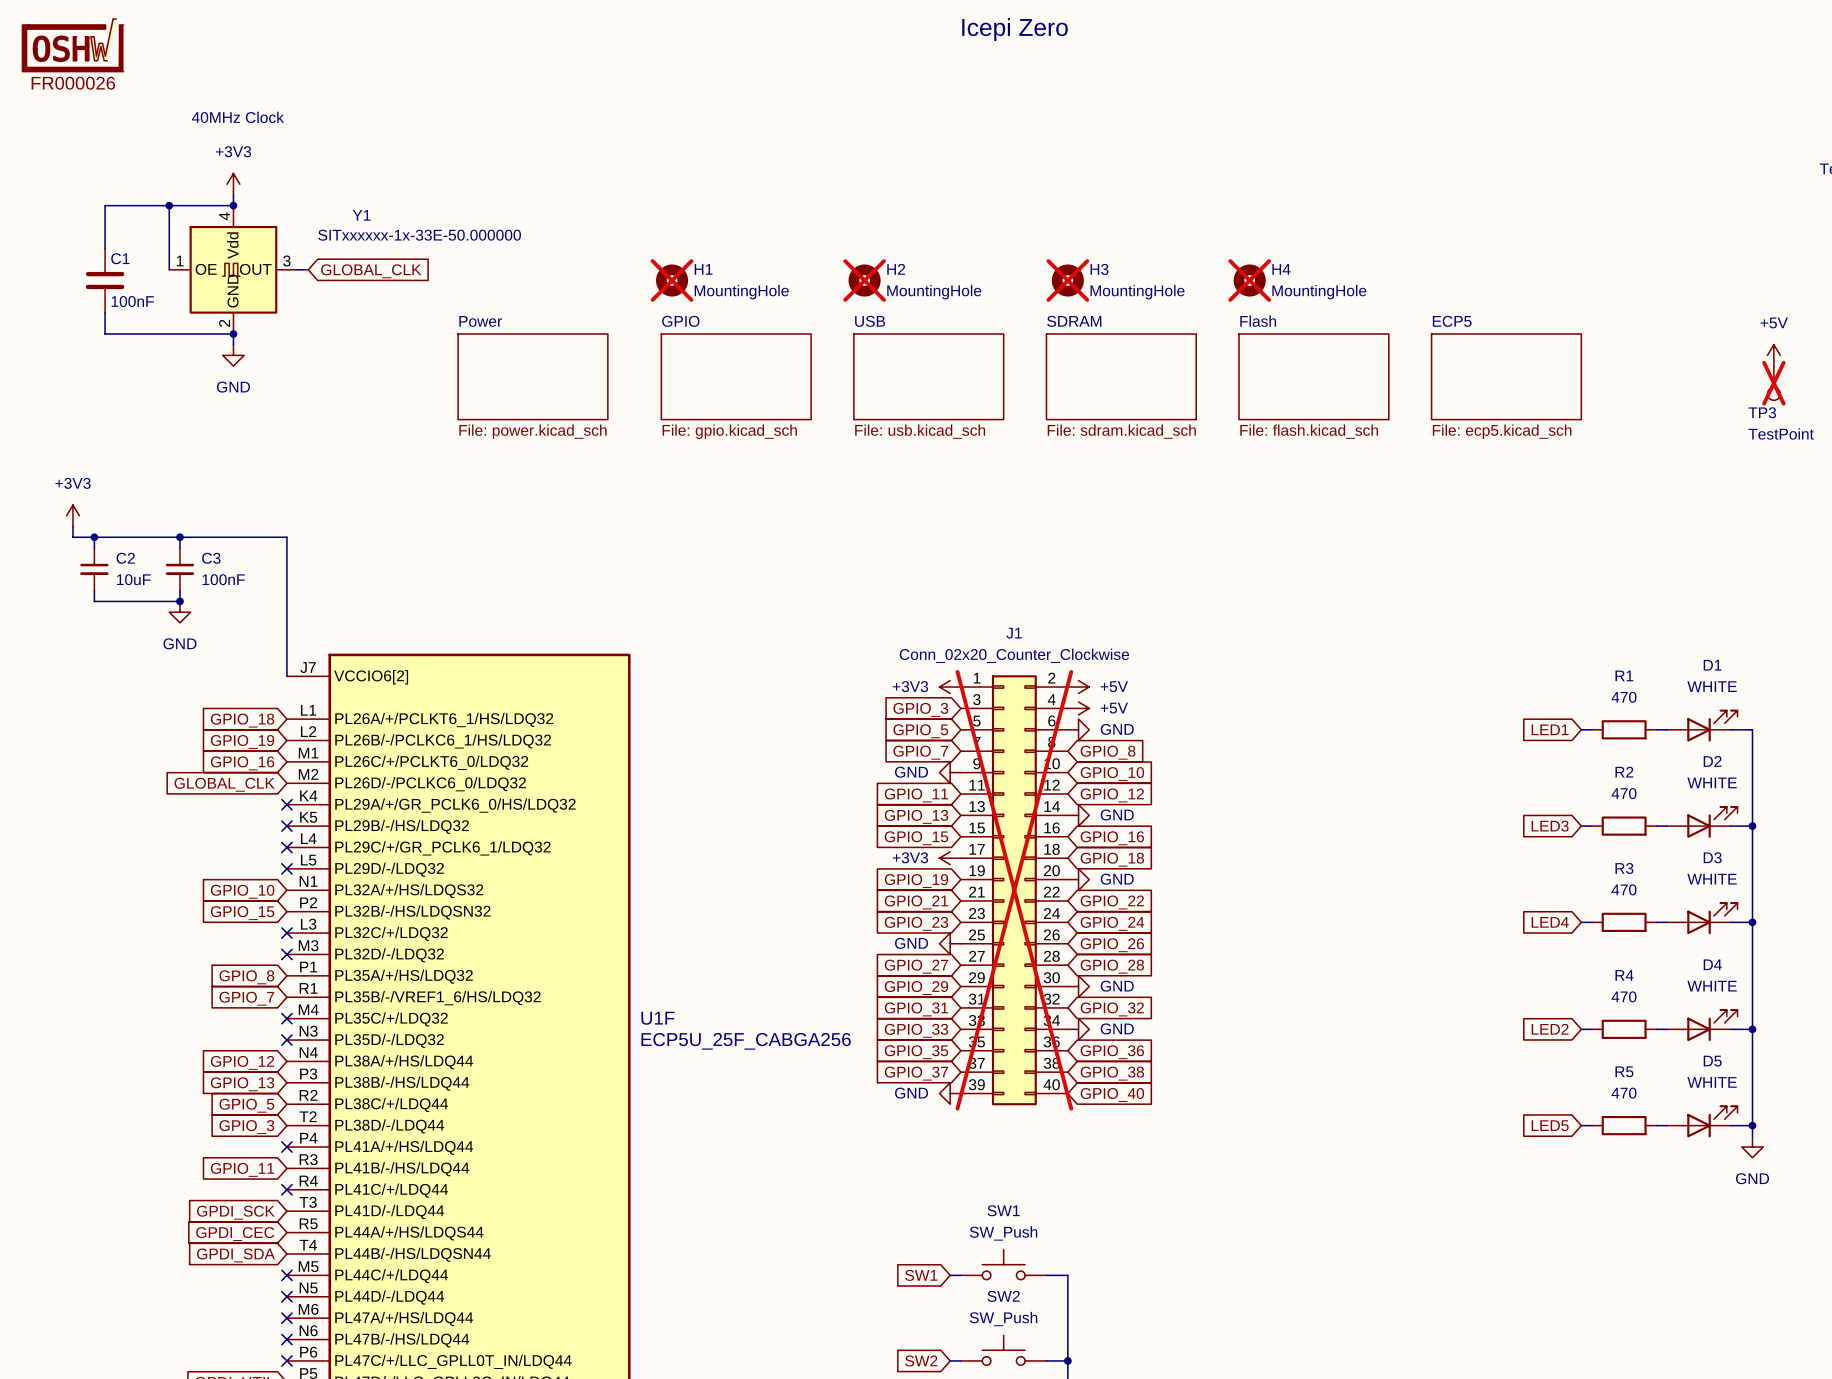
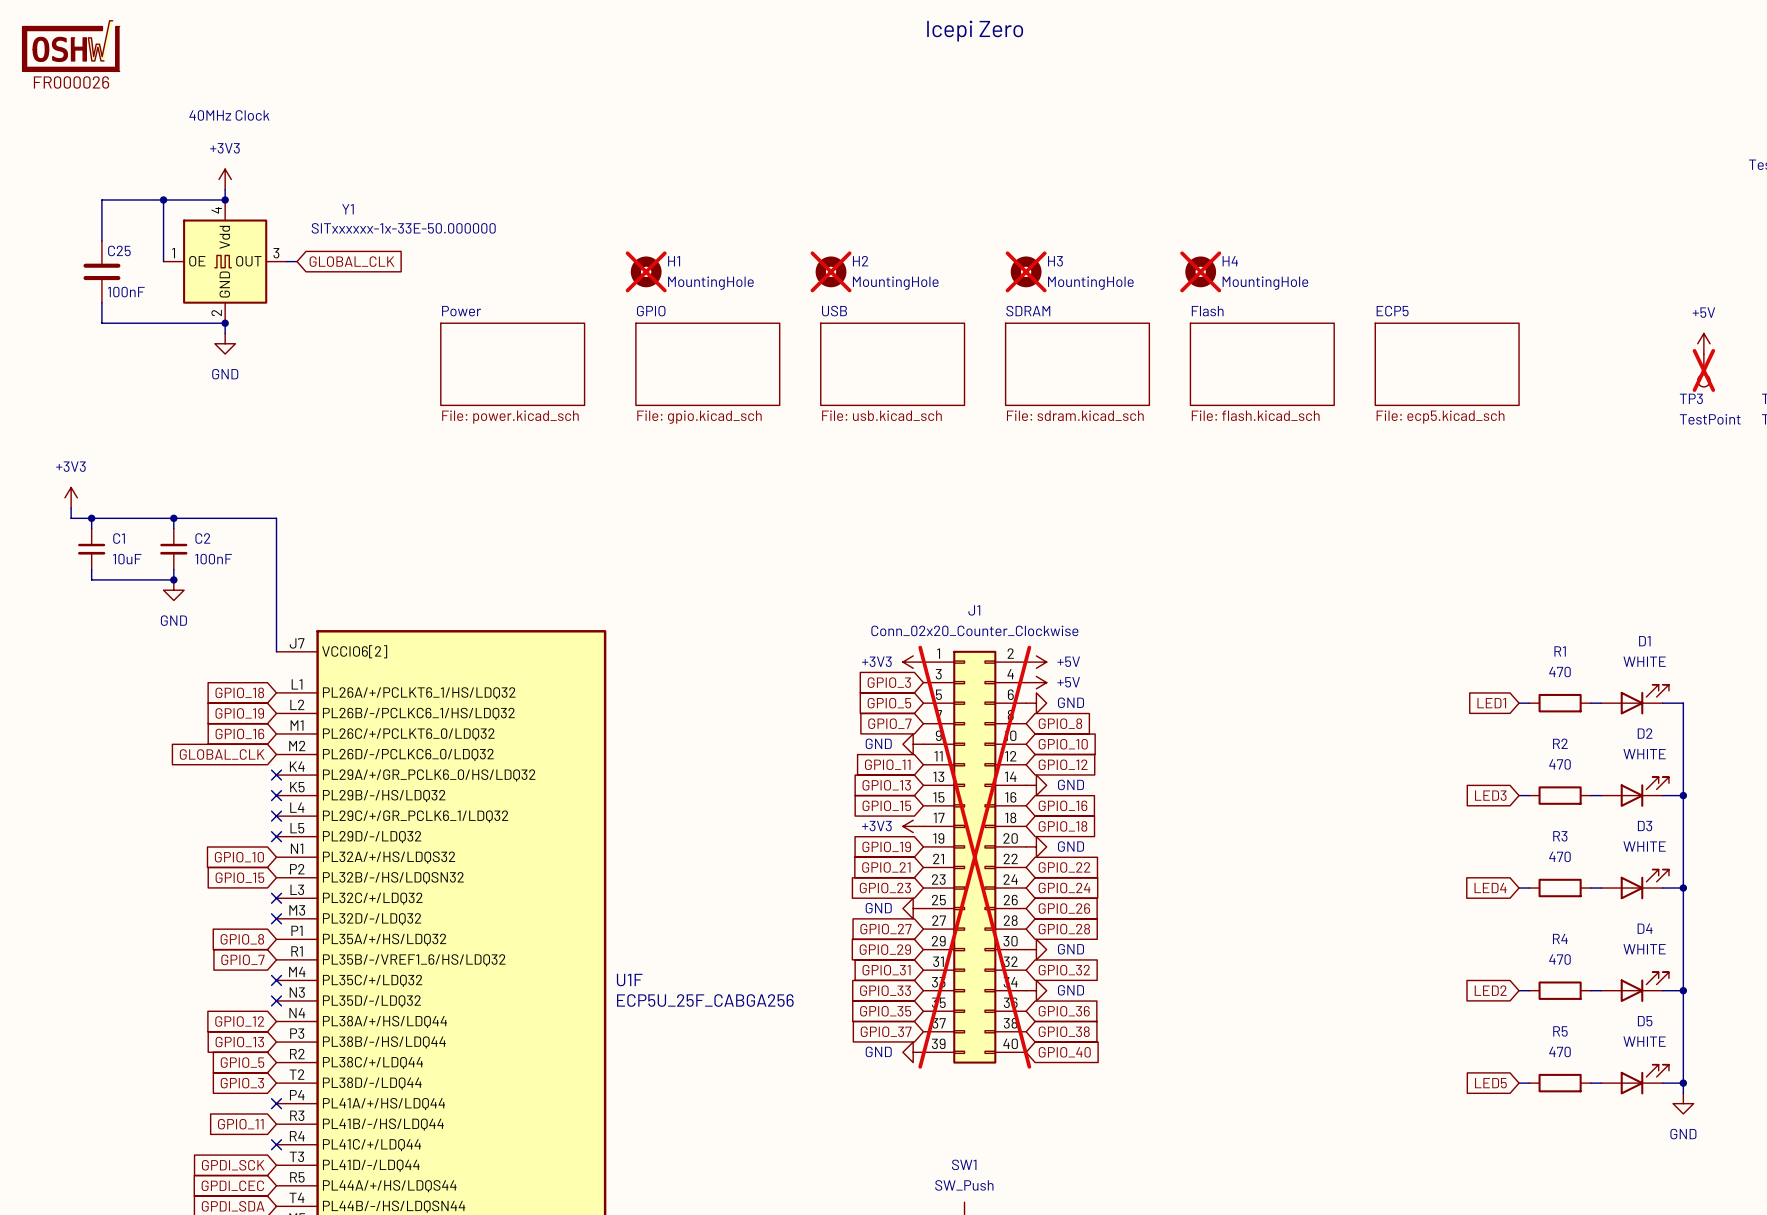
C1 name: C1 (120, 258) -> C25 (119, 250)
C2 name: C2 (125, 558) -> C1 (119, 538)
C3 name: C3 (211, 558) -> C2 (202, 538)

